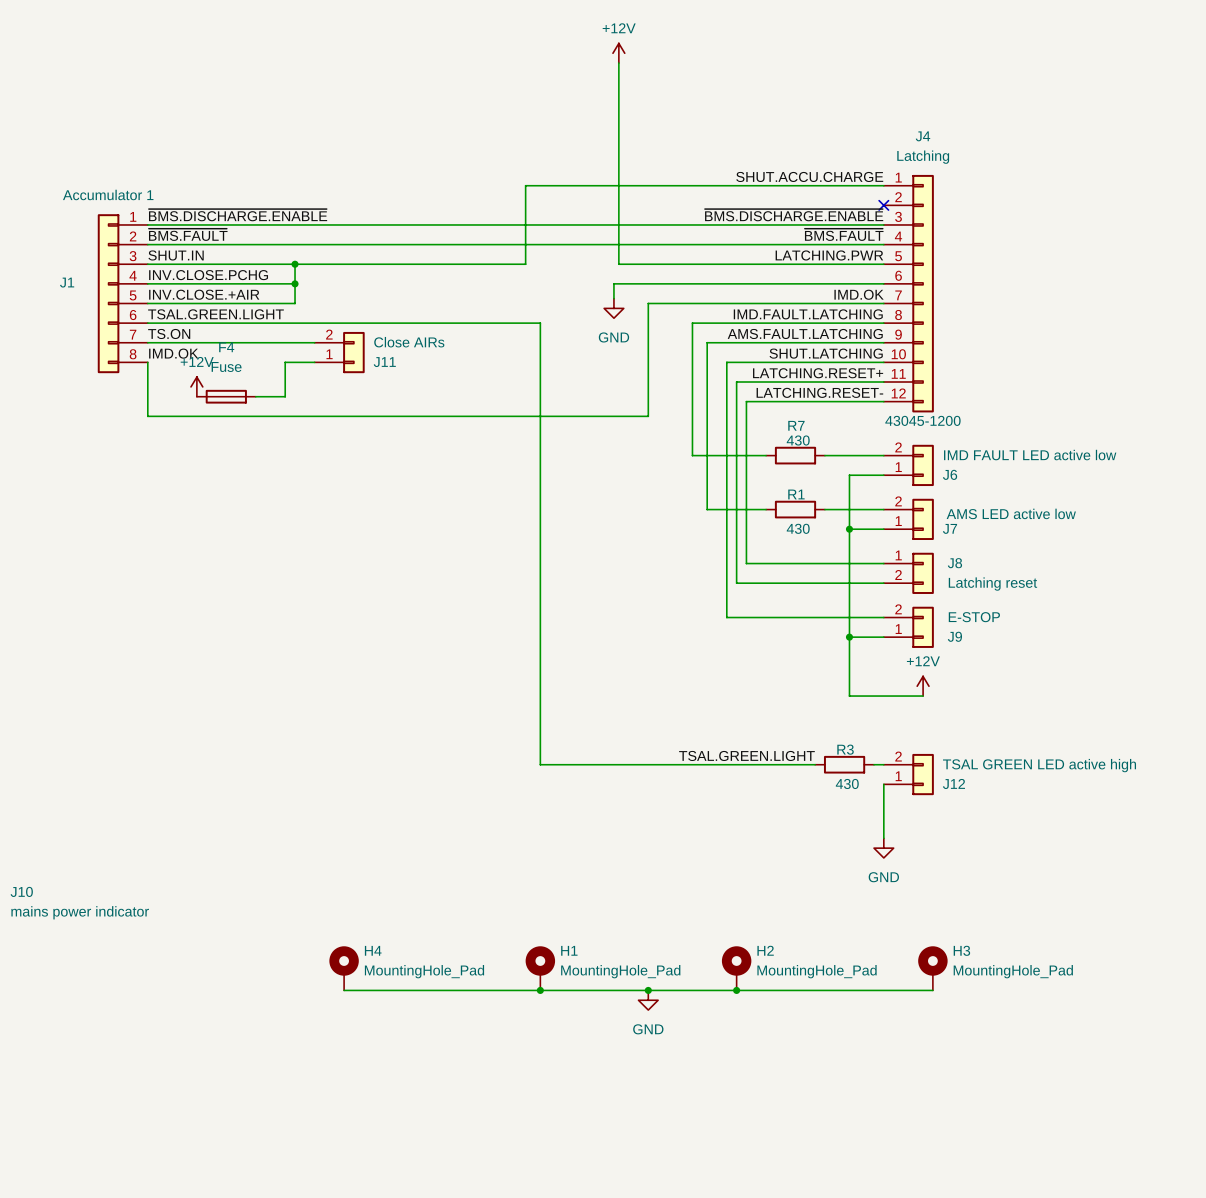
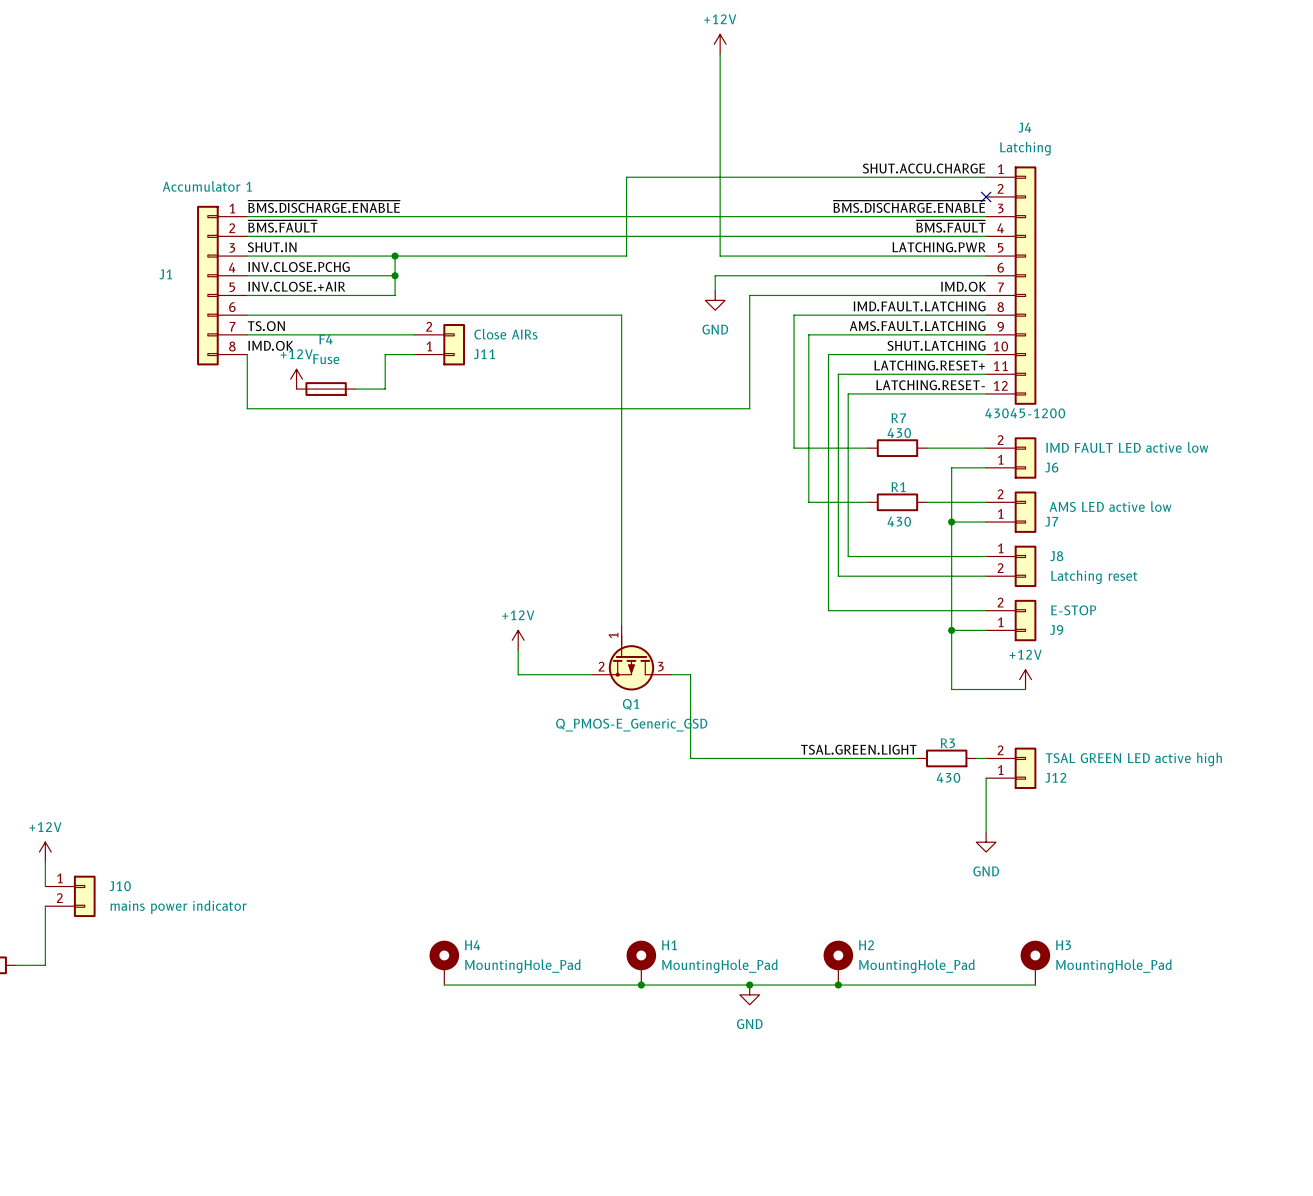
label: TSAL.GREEN.LIGHT (215, 314) -> none
wire: (520, 323) (540, 323) (540, 764) (589, 764) -> (621, 315) (621, 625)
power symbol: none -> +12V (518, 640)
wire: none -> (518, 650) (518, 674) (592, 674)
Q1: none -> Q_PMOS-E_Generic_GSD (631, 657)
wire: none -> (670, 674) (690, 674) (690, 758)

